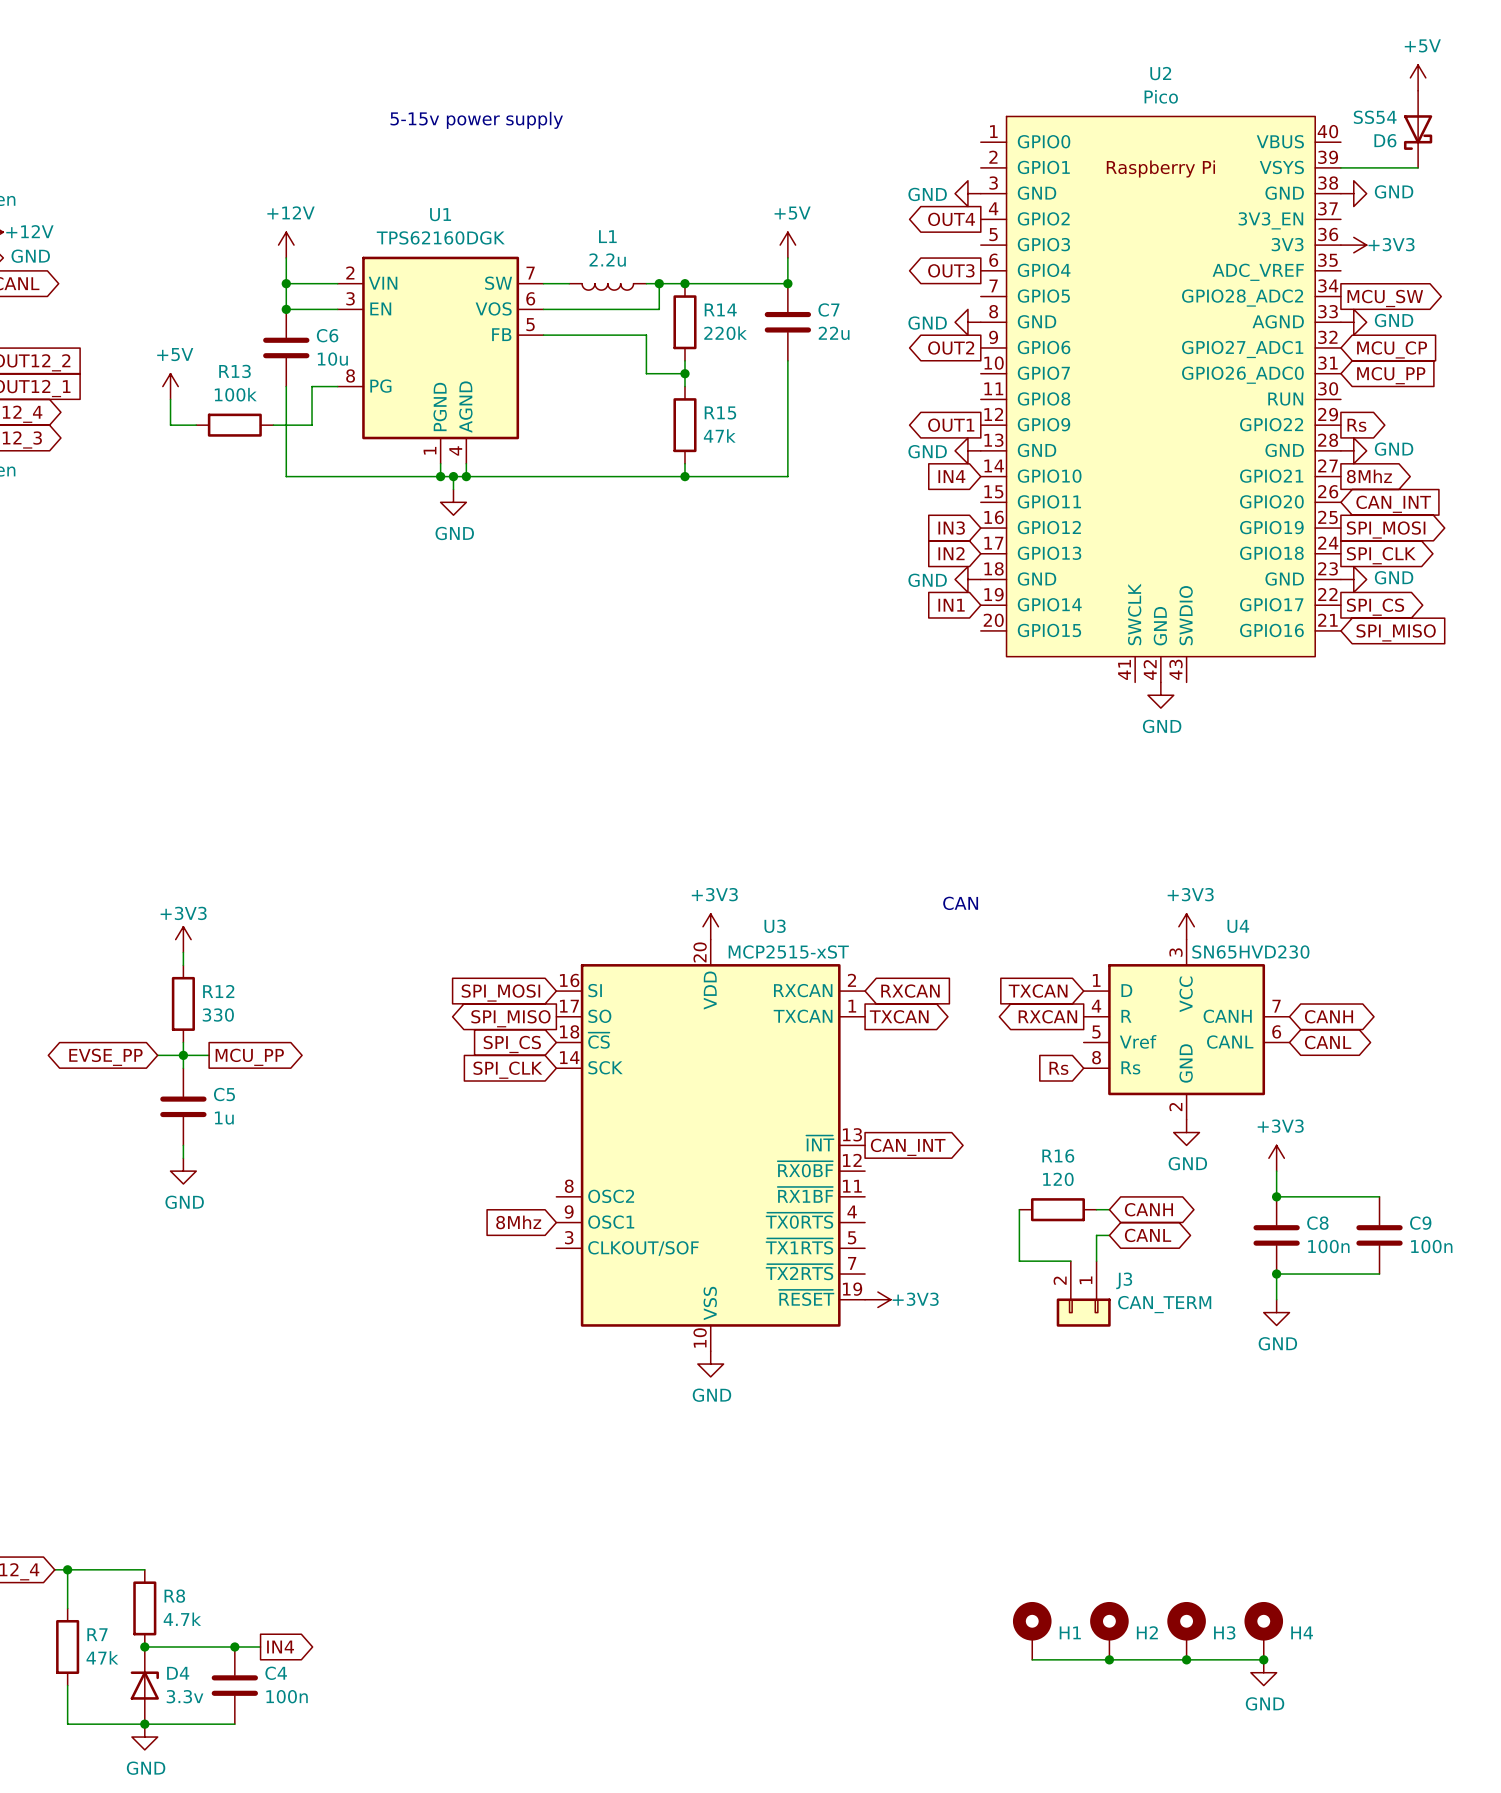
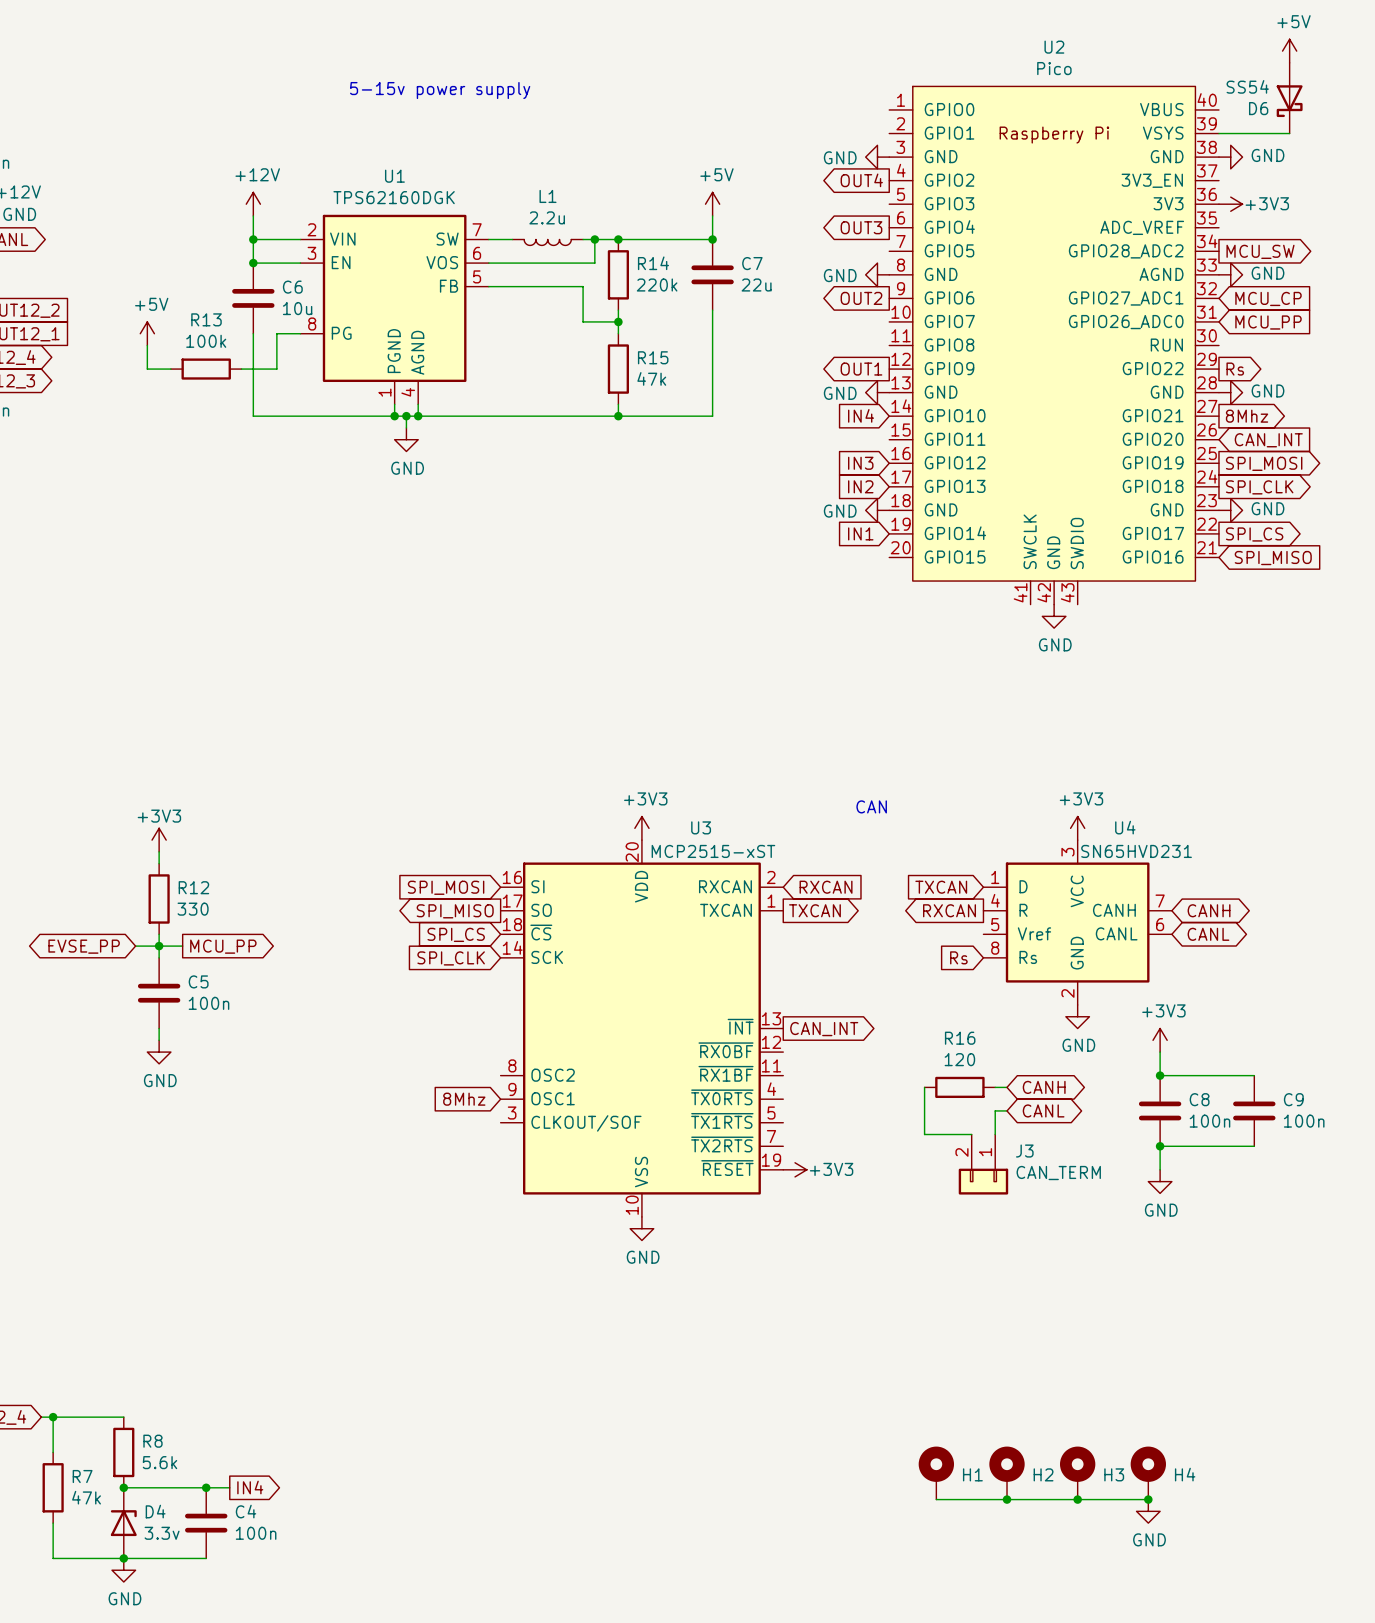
U4 value: SN65HVD230 (1250, 952) -> SN65HVD231 (1136, 851)
C5 value: 1u (224, 1118) -> 100n (209, 1003)
R8 value: 4.7k (182, 1619) -> 5.6k (159, 1462)

